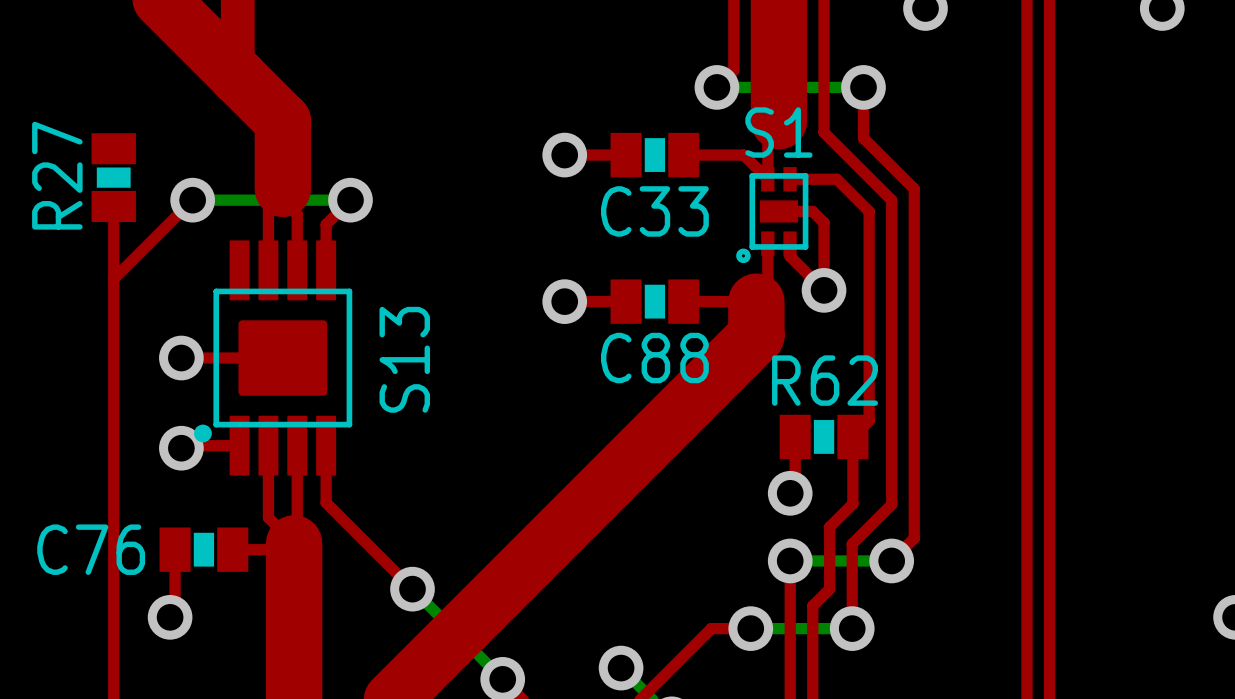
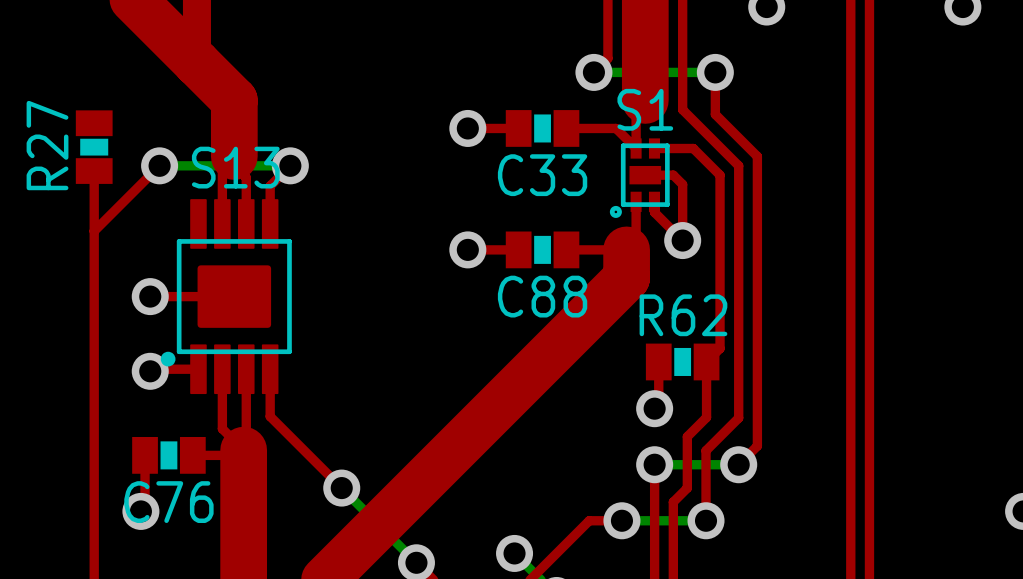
S13 name rotation: 0° (404, 359) -> 90° clockwise (235, 167)
S13 name position: S13 (404, 359) -> S13 (235, 167)
C76 name position: C76 (91, 549) -> C76 (168, 502)

